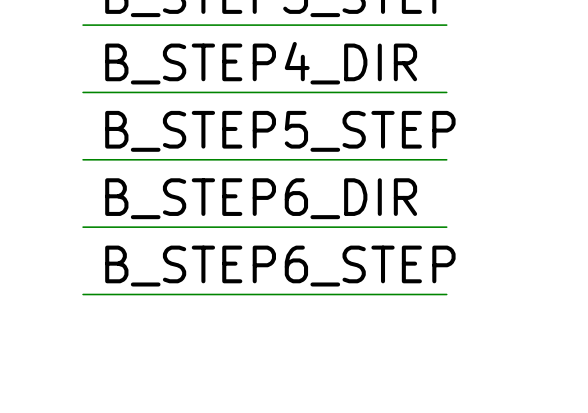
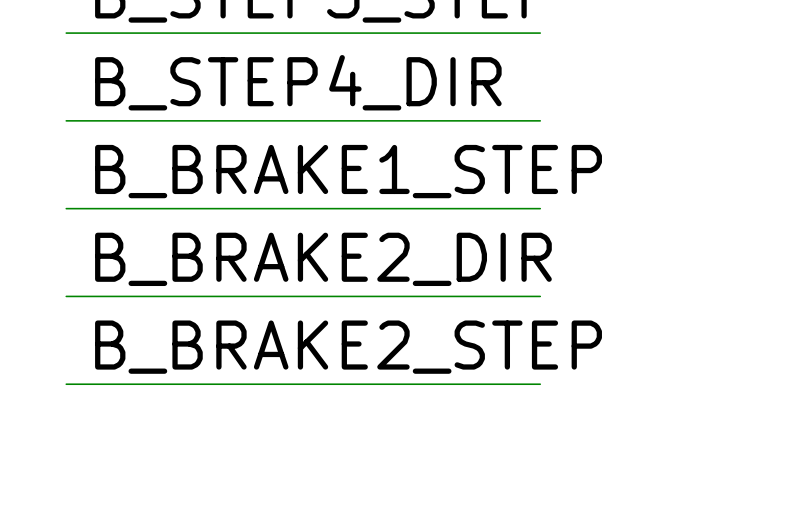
label: B_STEP5_STEP (280, 131) -> B_BRAKE1_STEP (348, 171)
label: B_STEP6_DIR (261, 198) -> B_BRAKE2_DIR (323, 259)
label: B_STEP6_STEP (280, 266) -> B_BRAKE2_STEP (348, 347)

